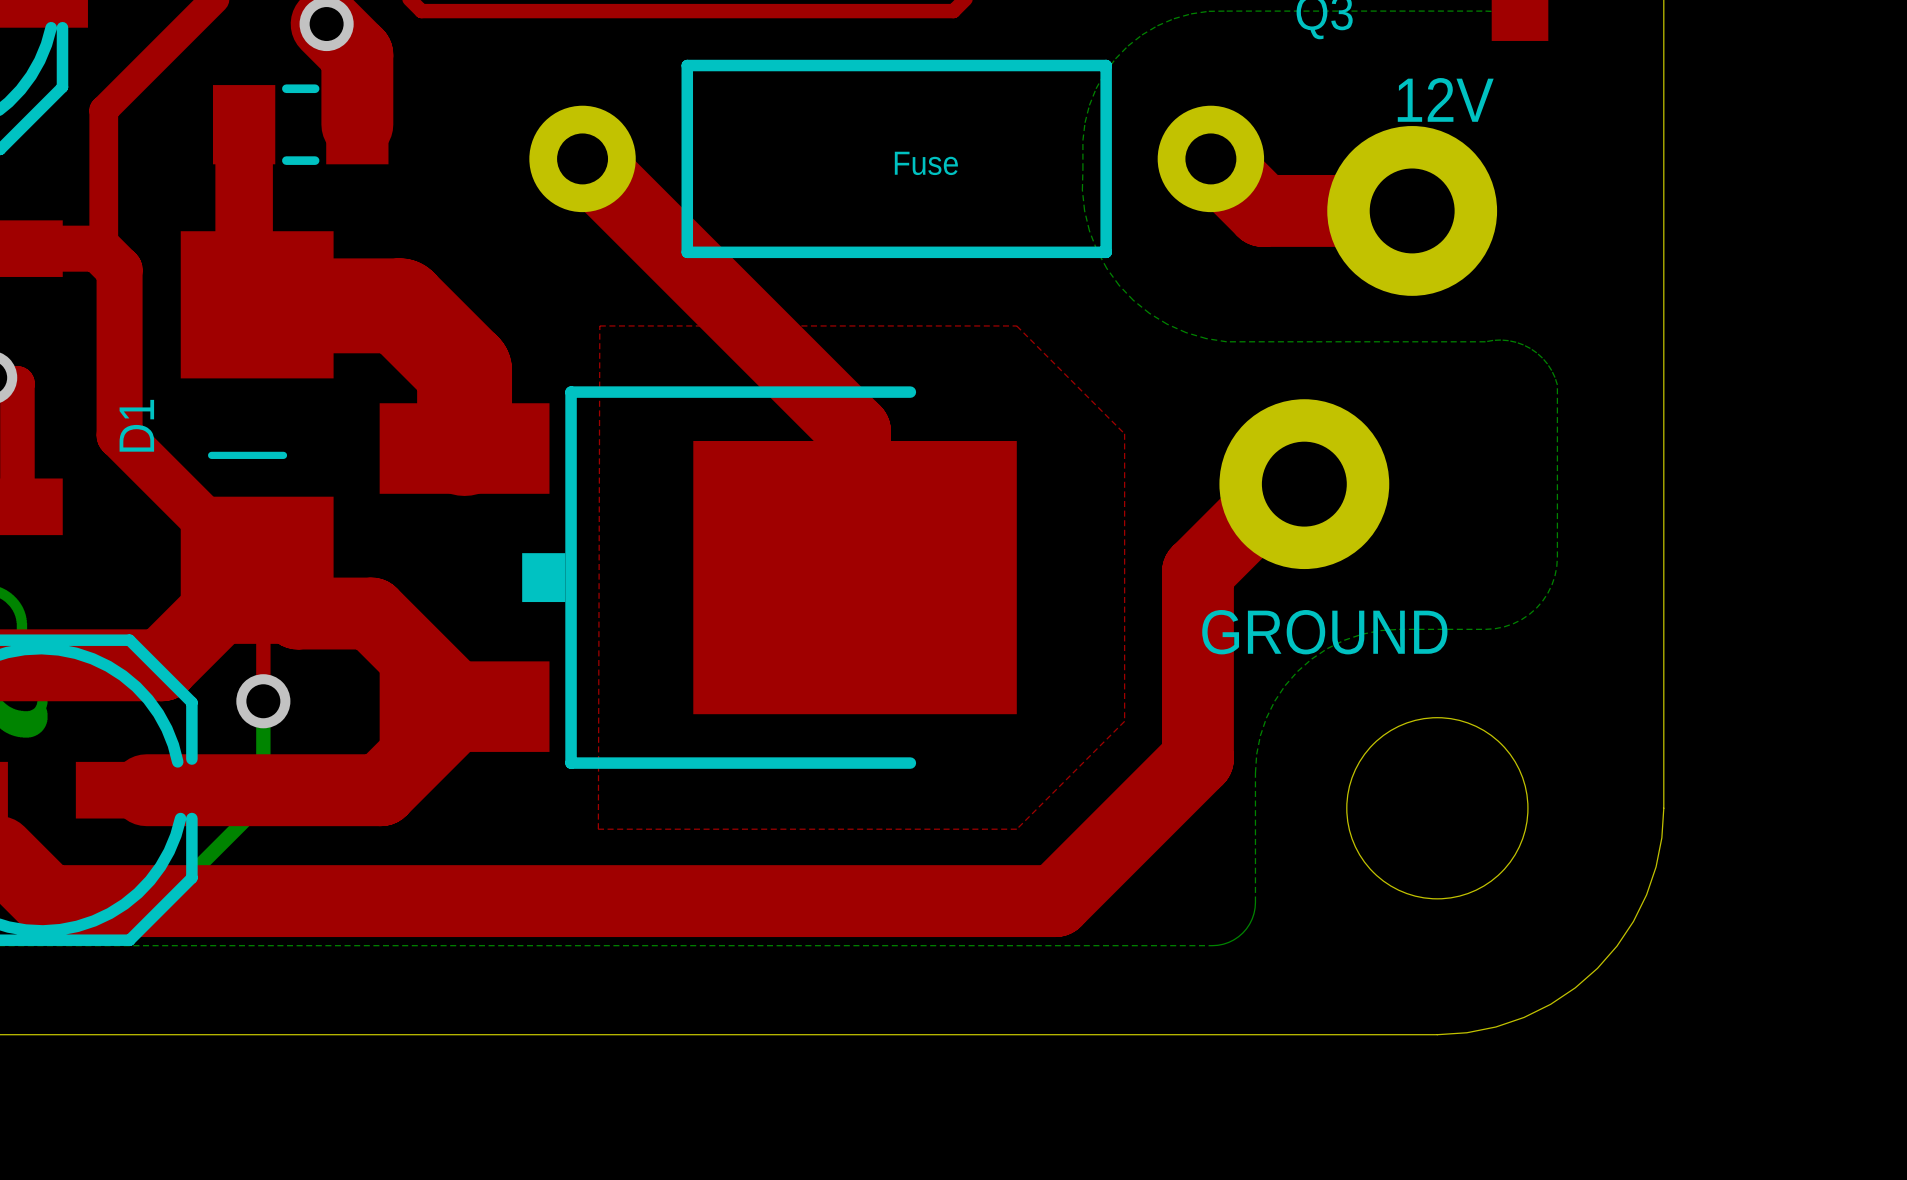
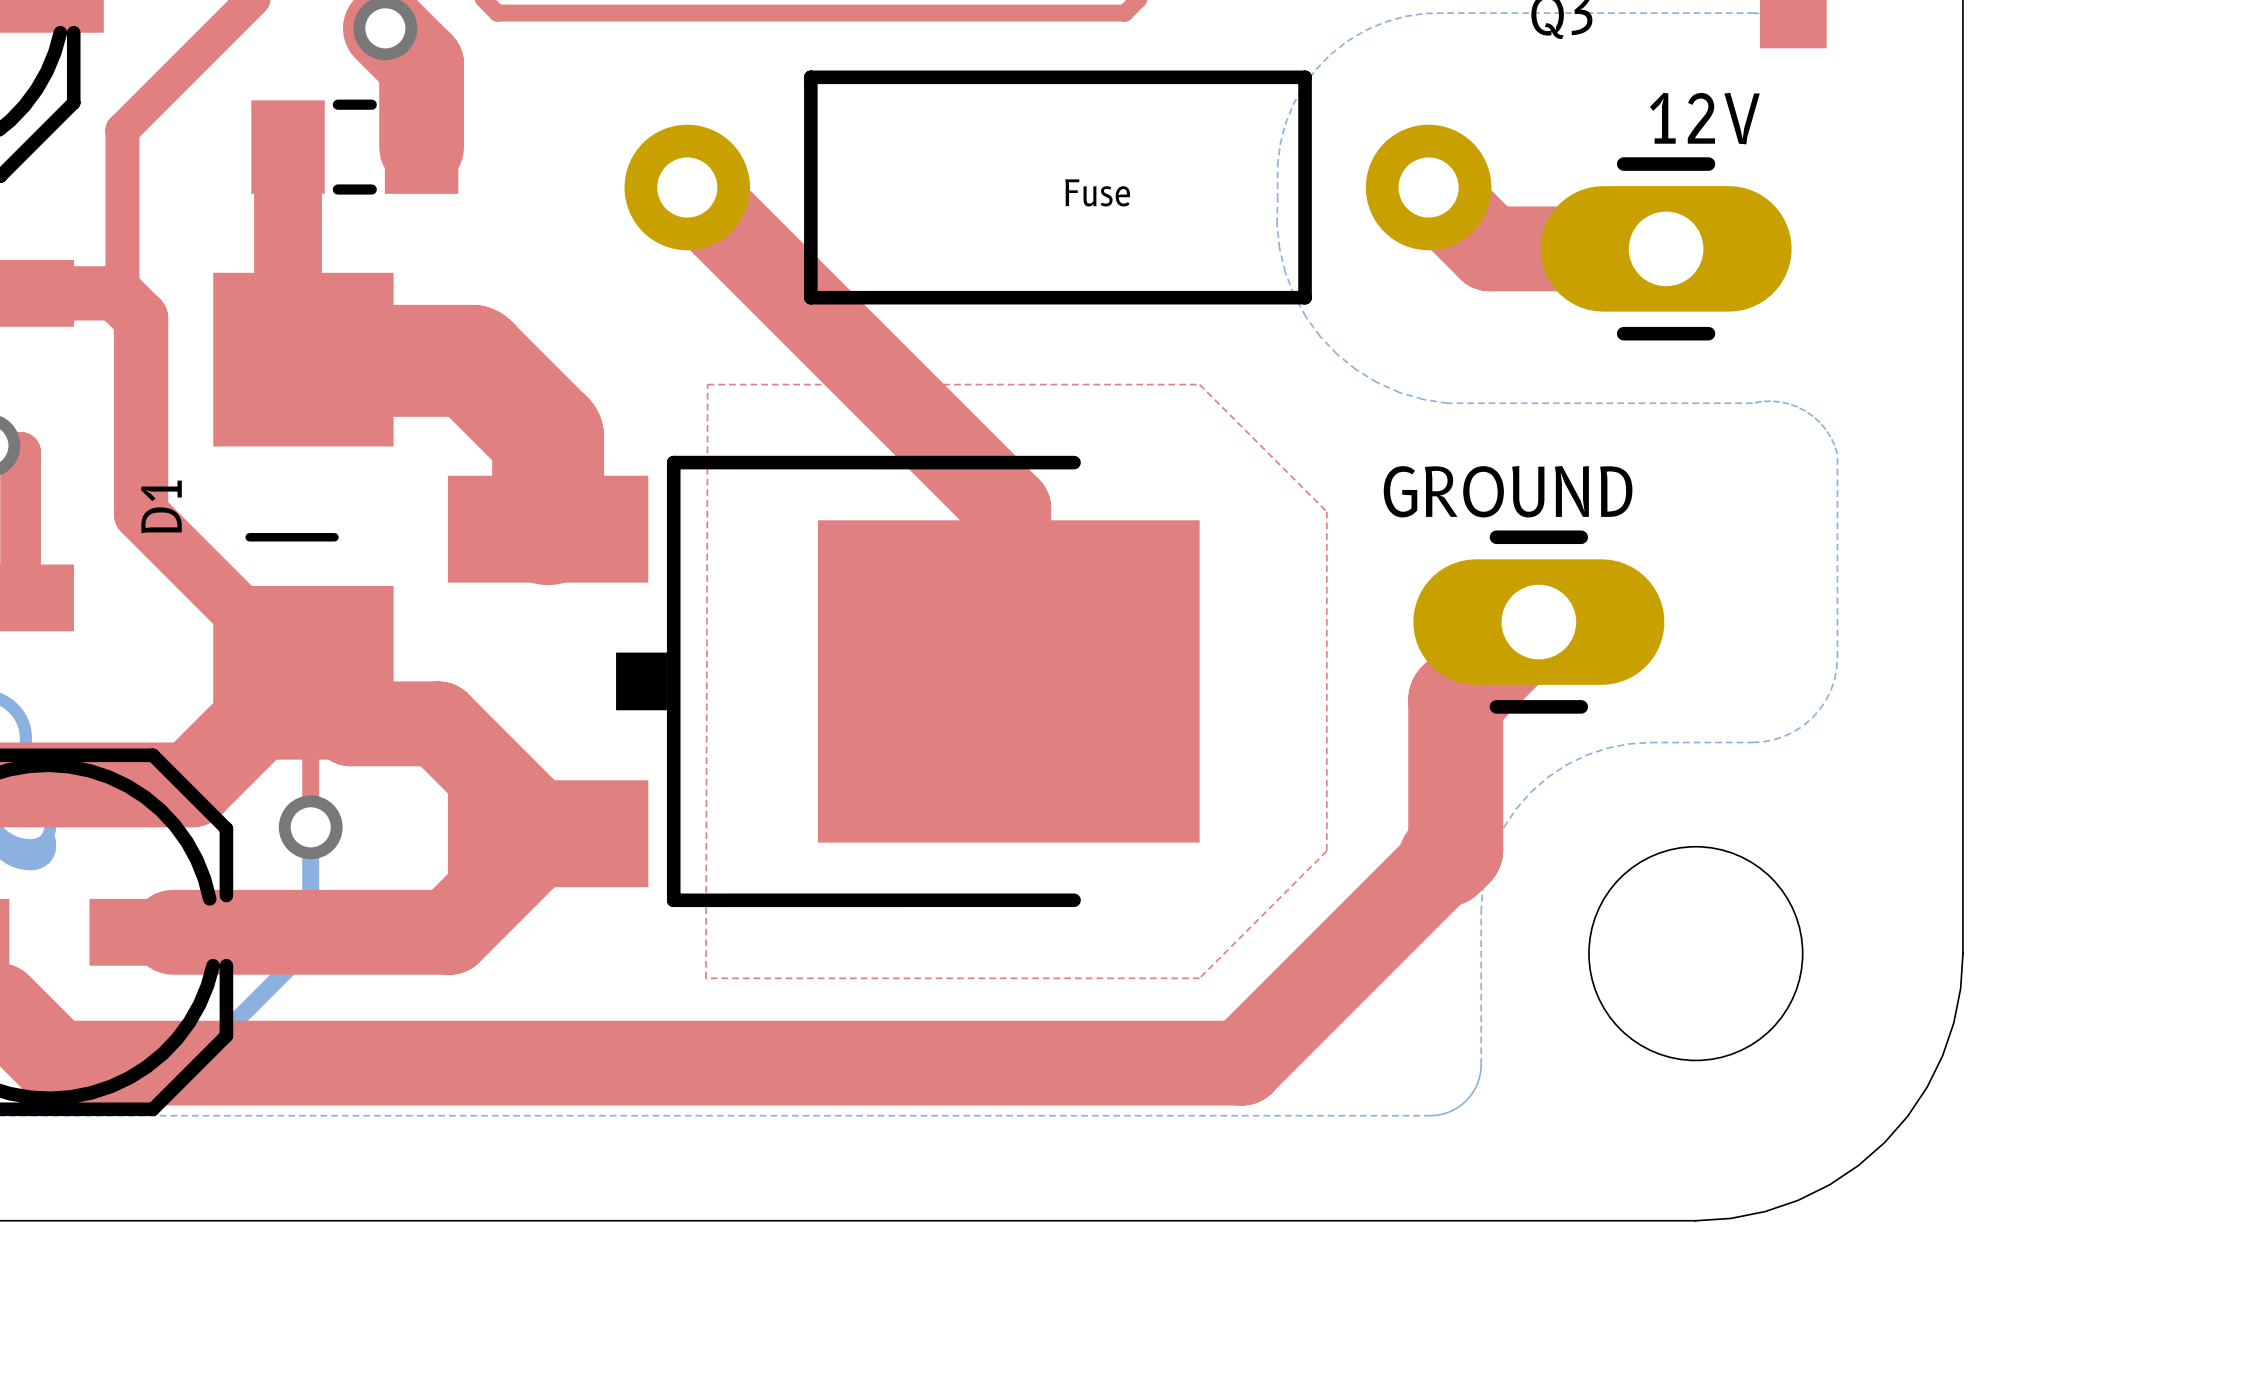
12V footprint: [1327, 126, 1498, 296] -> [1540, 157, 1792, 341]
GROUND footprint: [1219, 399, 1390, 570] -> [1413, 530, 1665, 714]
top track: (1302, 485) (1284, 485) (1197, 571) (1197, 758) (1055, 901) (1052, 901) -> (1538, 616) (1455, 700) (1455, 849) (1242, 1063)
GROUND name position: GROUND (1324, 632) -> GROUND (1508, 491)

